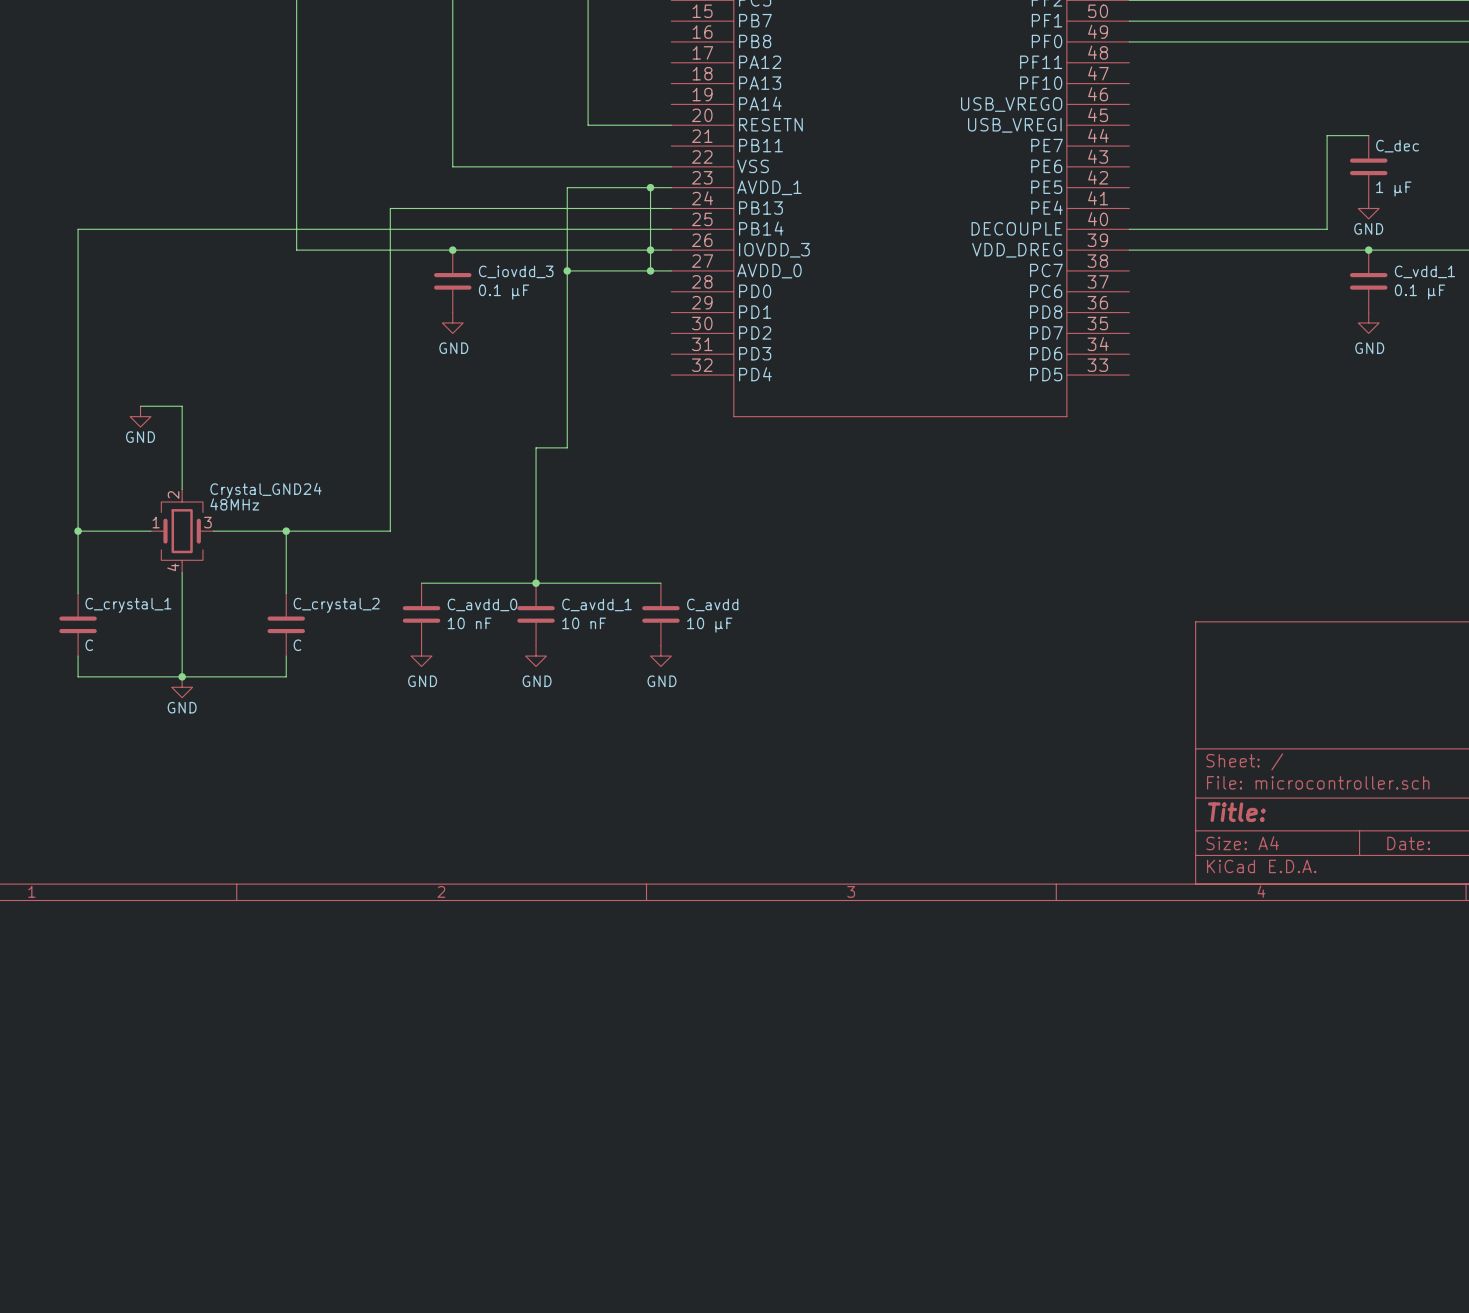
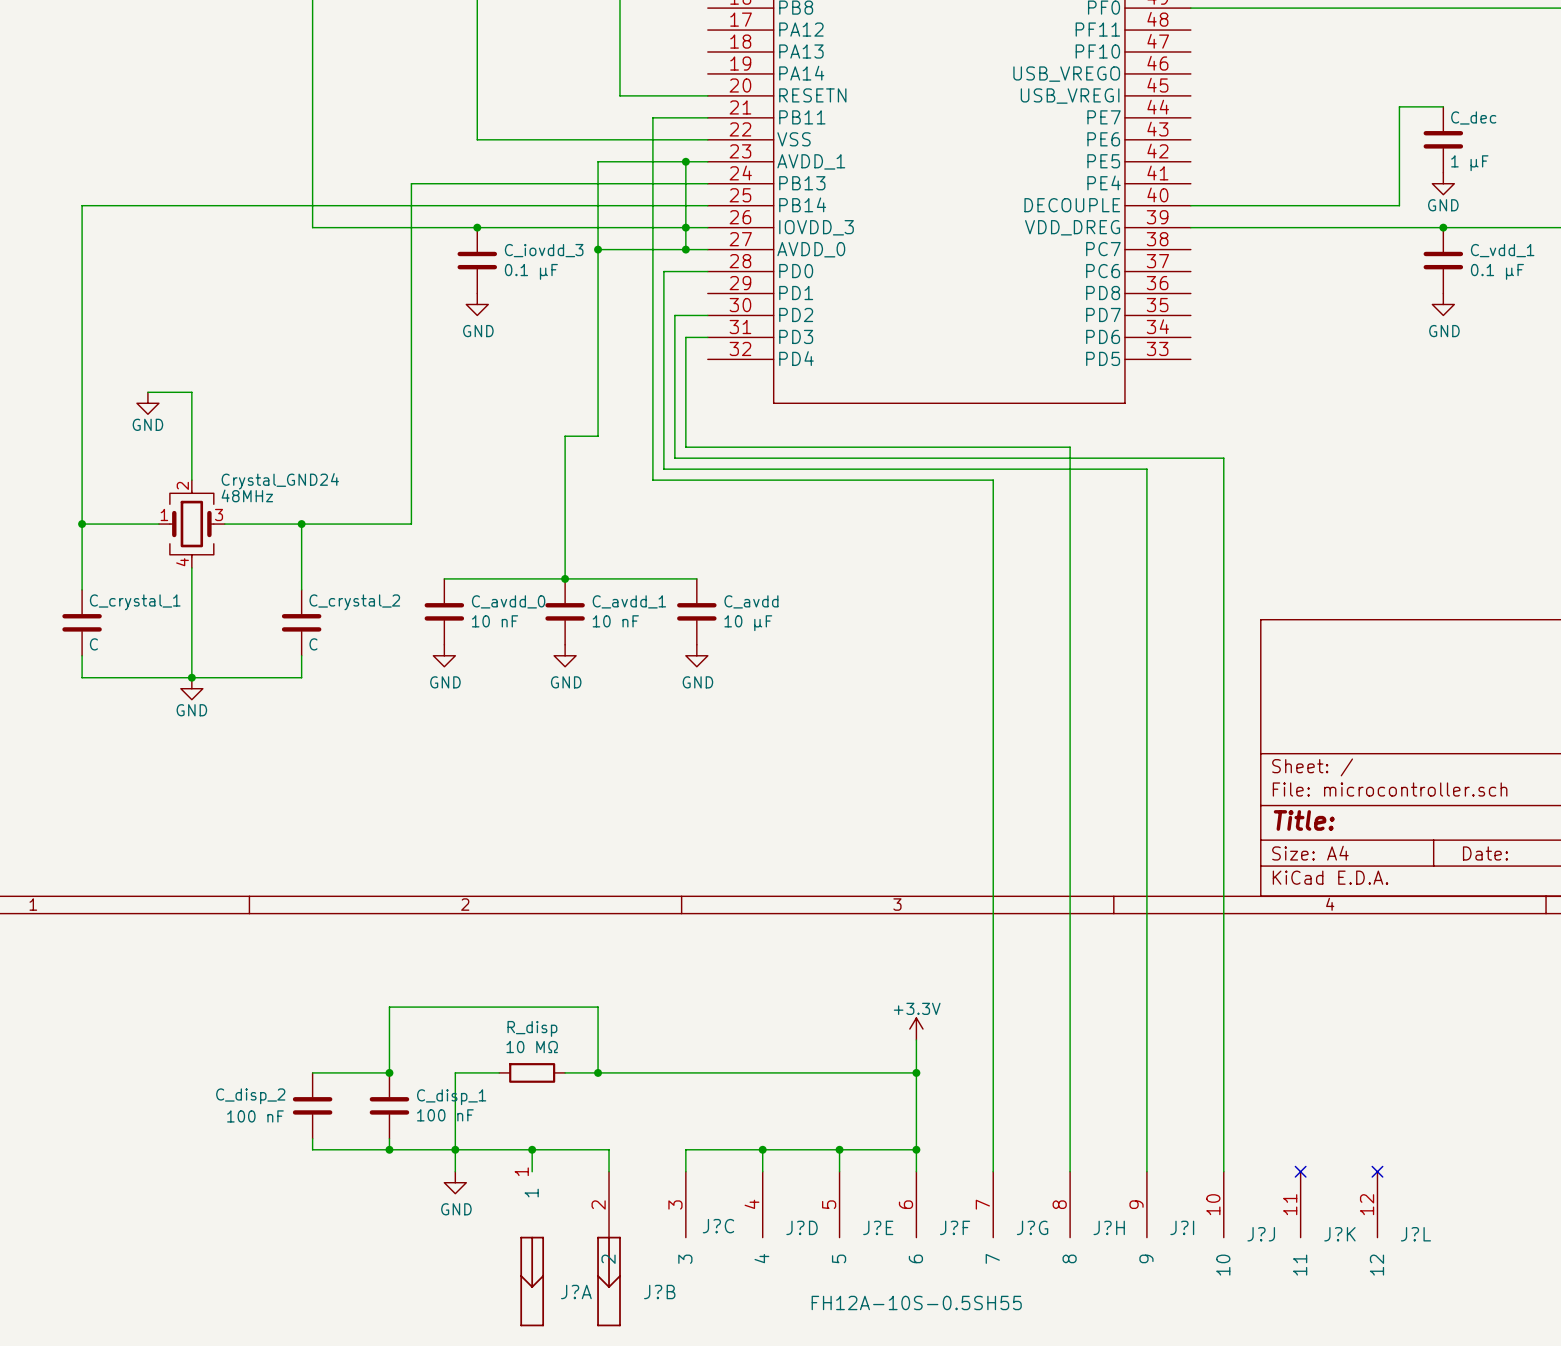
wire: none -> (707, 117) (652, 117) (652, 480) (993, 480) (993, 1171)
wire: none -> (707, 271) (663, 271) (663, 469) (1146, 469) (1146, 1171)
wire: none -> (707, 315) (674, 315) (674, 458) (1223, 458) (1223, 1171)
wire: none -> (707, 337) (685, 337) (685, 447) (1070, 447) (1070, 1171)
power symbol: none -> +3.3V (916, 1029)
wire: none -> (916, 1040) (916, 1171)
wire: none -> (312, 1072) (389, 1072) (389, 1007) (598, 1007) (598, 1072)
junction: none -> (389, 1072)
wire: none -> (499, 1072) (455, 1072) (455, 1171)
R_disp: none -> 10 MΩ (532, 1072)
wire: none -> (565, 1072) (916, 1072)
junction: none -> (598, 1072)
junction: none -> (916, 1072)
C_disp_2: none -> 100 nF (312, 1105)
C_disp_1: none -> 100 nF (389, 1105)
wire: none -> (312, 1138) (312, 1149) (609, 1149) (609, 1171)
wire: none -> (389, 1138) (389, 1149)
junction: none -> (389, 1149)
junction: none -> (455, 1149)
wire: none -> (532, 1149) (532, 1171)
junction: none -> (532, 1149)
wire: none -> (762, 1149) (762, 1171)
junction: none -> (762, 1149)
wire: none -> (839, 1149) (839, 1171)
junction: none -> (839, 1149)
wire: none -> (916, 1149) (685, 1149) (685, 1171)
junction: none -> (916, 1149)
no-connect mark: none -> (1300, 1171)
no-connect mark: none -> (1377, 1171)
power symbol: none -> GND (455, 1182)
J?C: none -> (685, 1204)
J?D: none -> (762, 1204)
J?E: none -> (839, 1204)
J?F: none -> (916, 1204)
J?G: none -> (993, 1204)
J?H: none -> (1070, 1204)
J?I: none -> (1146, 1204)
J?J: none -> (1223, 1204)
J?K: none -> (1300, 1204)
J?L: none -> (1377, 1204)
J?B: none -> (609, 1249)
J?A: none -> FH12A-10S-0.5SH55 (532, 1281)

